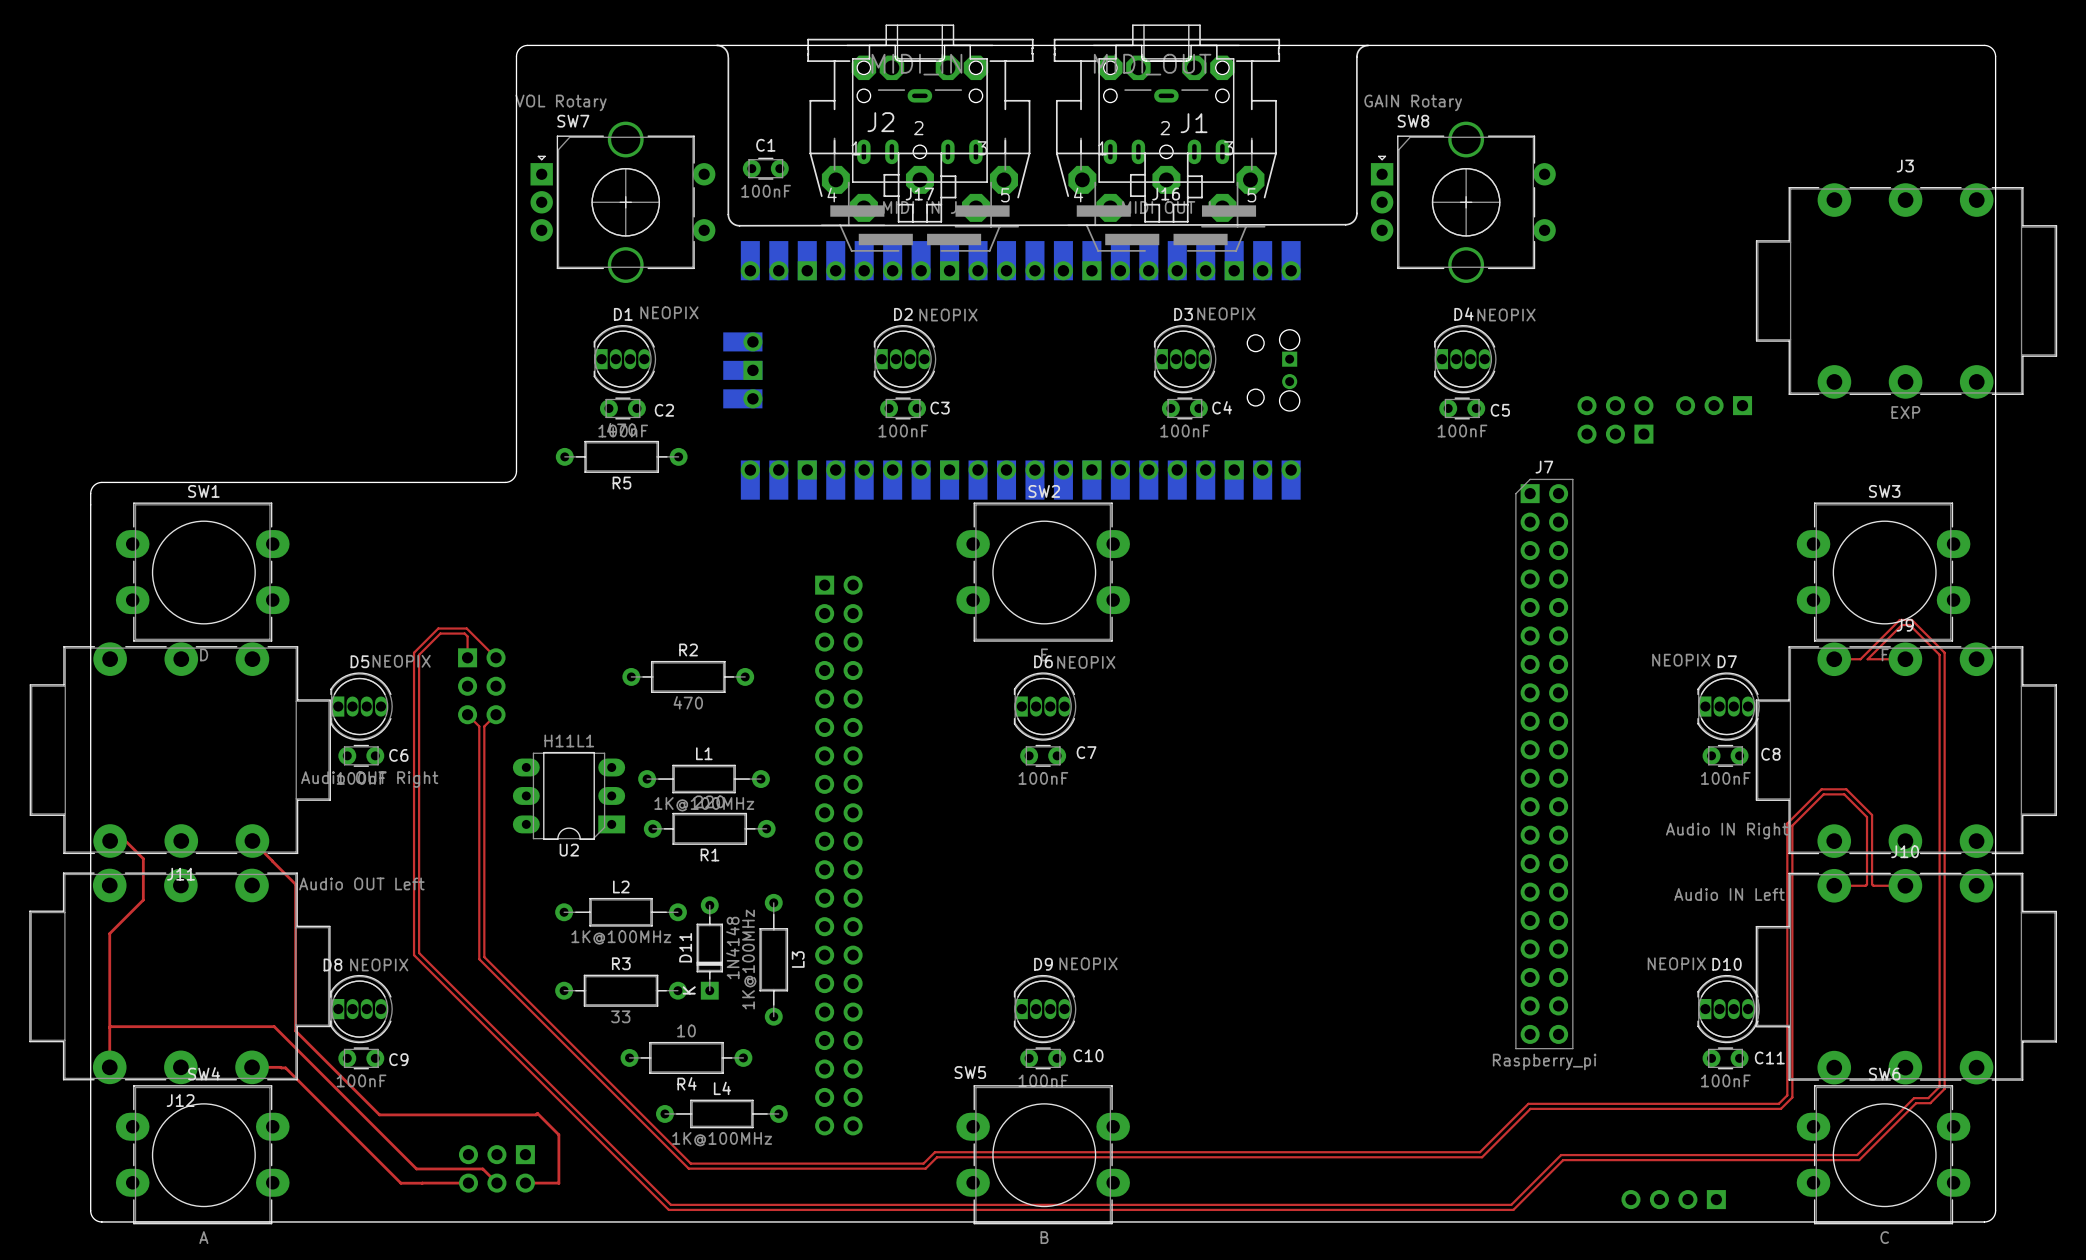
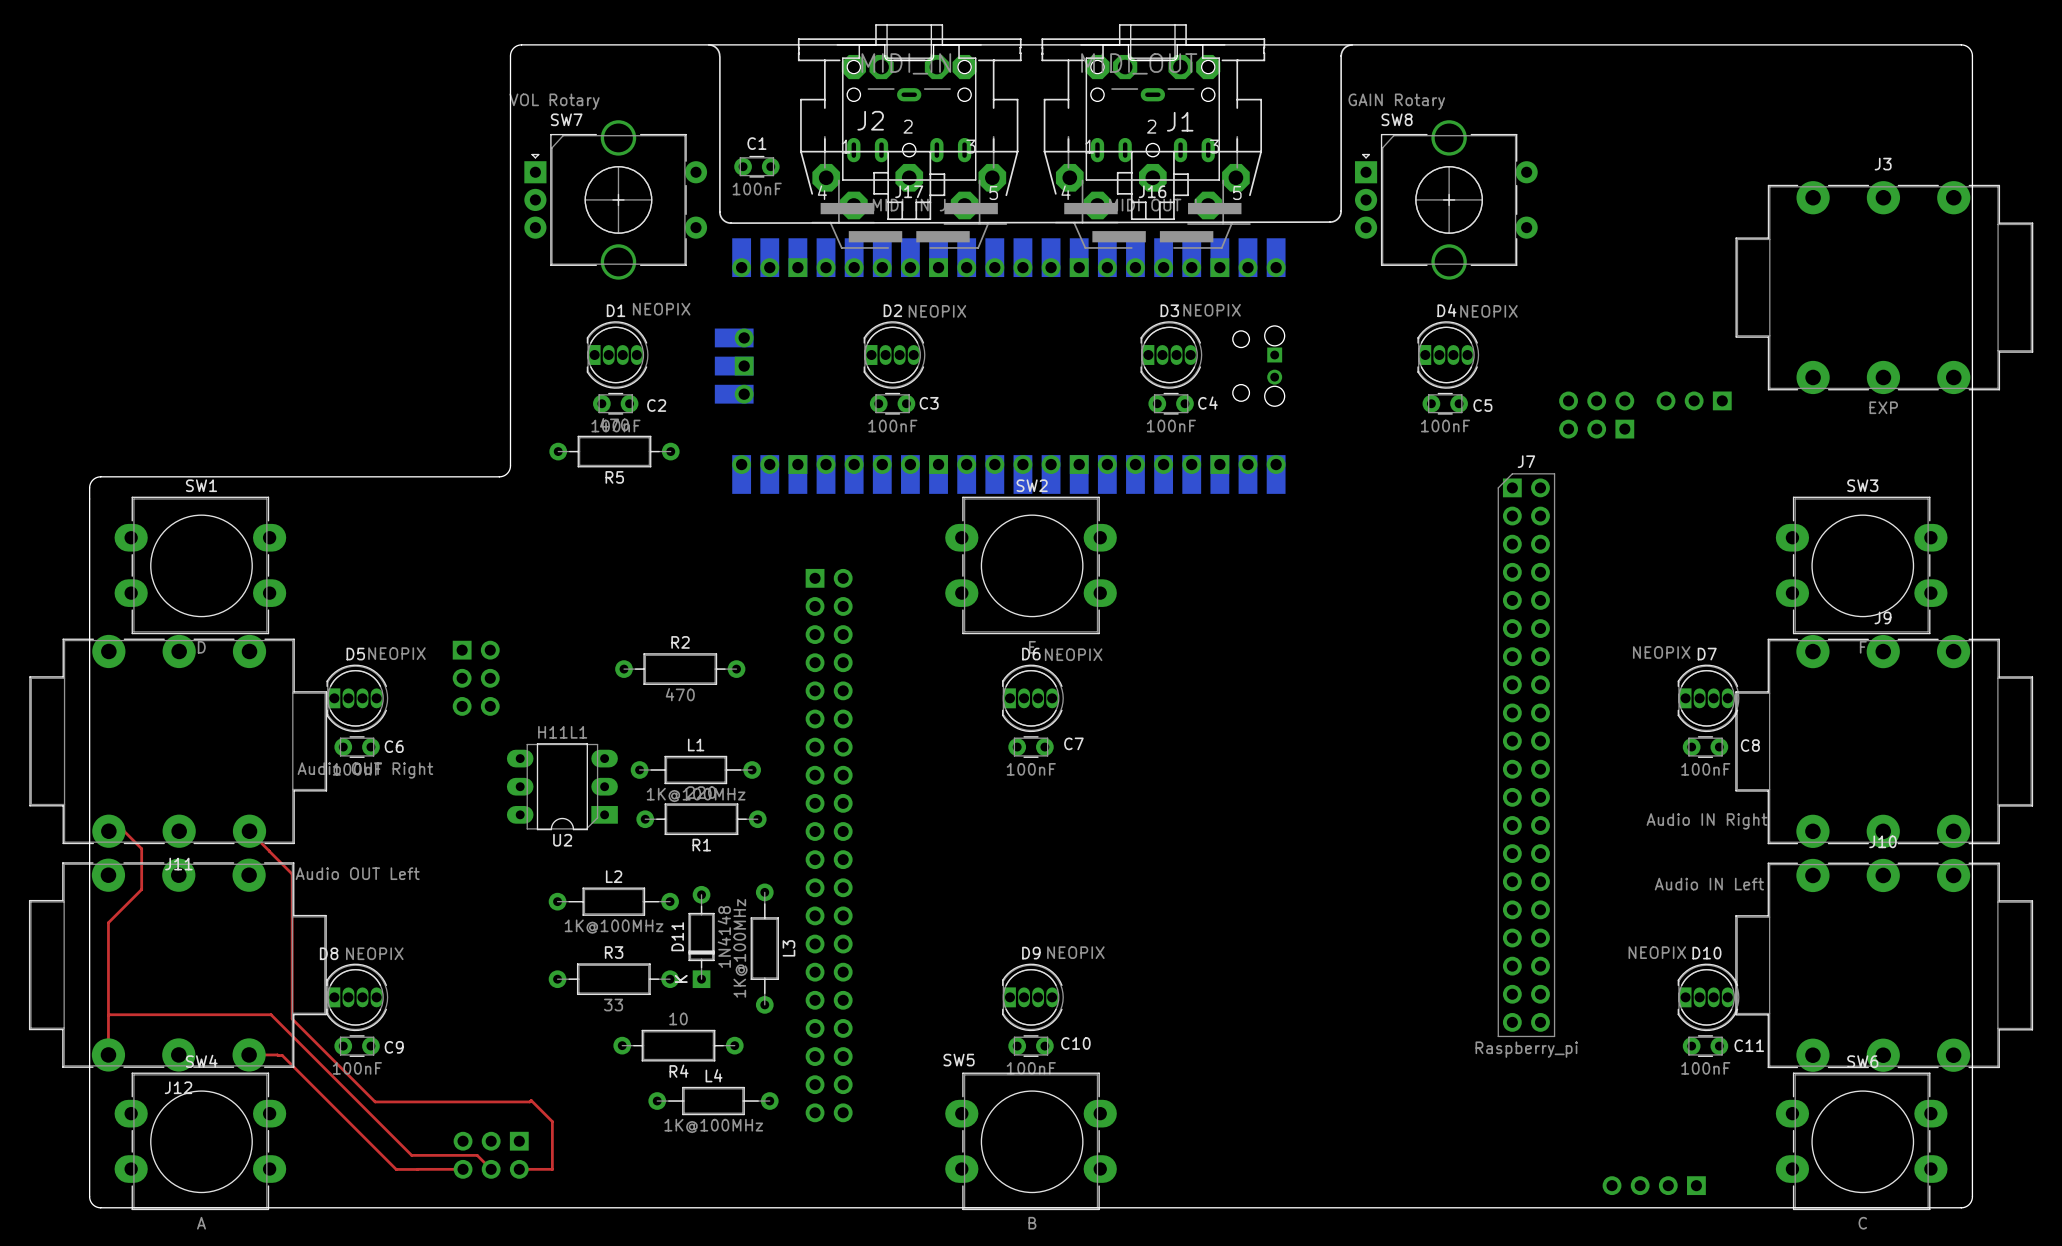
top track: (467, 657) (467, 636) (464, 633) (440, 633) (419, 654) (419, 953) (670, 1204) (1511, 1204) (1561, 1155) (1857, 1155) (1914, 1098) (1928, 1098) (1939, 1086) (1939, 654) (1909, 625) (1901, 625) (1867, 659) (1905, 659) -> none
top track: (496, 657) (466, 628) (438, 628) (414, 652) (414, 955) (668, 1209) (1513, 1209) (1563, 1160) (1859, 1160) (1916, 1103) (1930, 1103) (1944, 1088) (1944, 652) (1911, 619) (1899, 619) (1860, 659) (1834, 659) -> none
top track: (467, 714) (479, 726) (479, 959) (688, 1168) (925, 1168) (937, 1157) (1482, 1157) (1530, 1108) (1780, 1108) (1792, 1097) (1792, 825) (1823, 794) (1844, 794) (1867, 817) (1867, 884) (1834, 885) -> none
top track: (496, 714) (484, 726) (484, 957) (690, 1163) (923, 1163) (934, 1152) (1480, 1152) (1528, 1103) (1778, 1103) (1787, 1095) (1787, 823) (1821, 789) (1846, 789) (1872, 815) (1872, 884) (1905, 885) -> none

